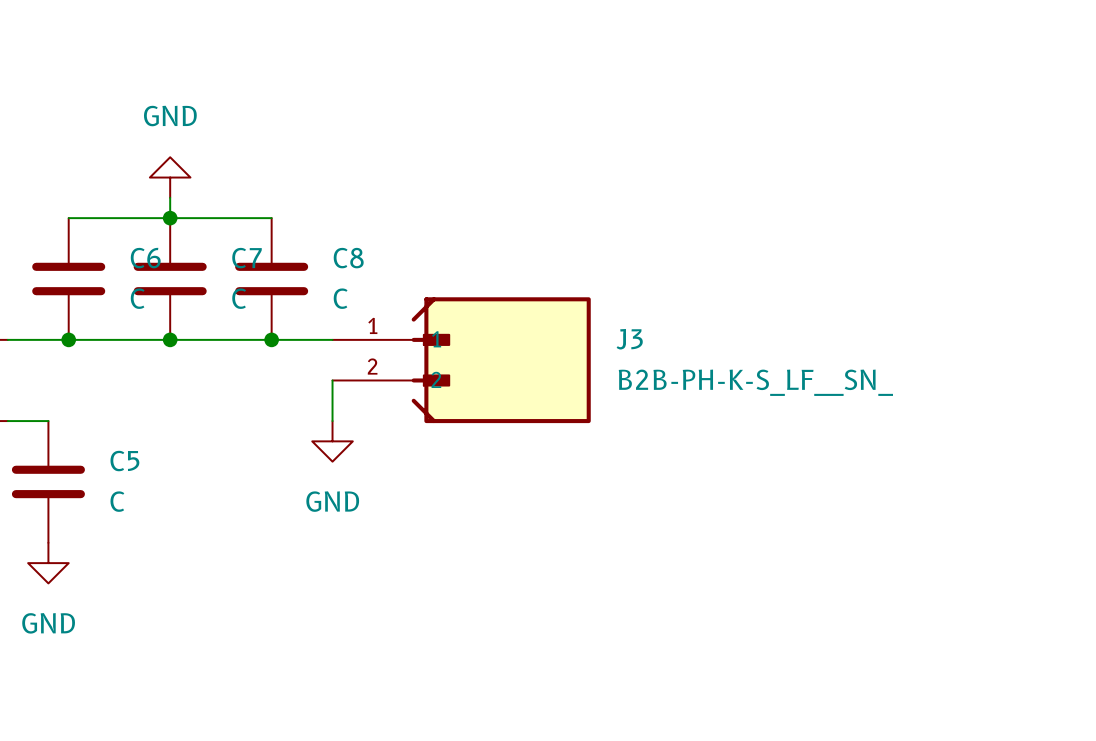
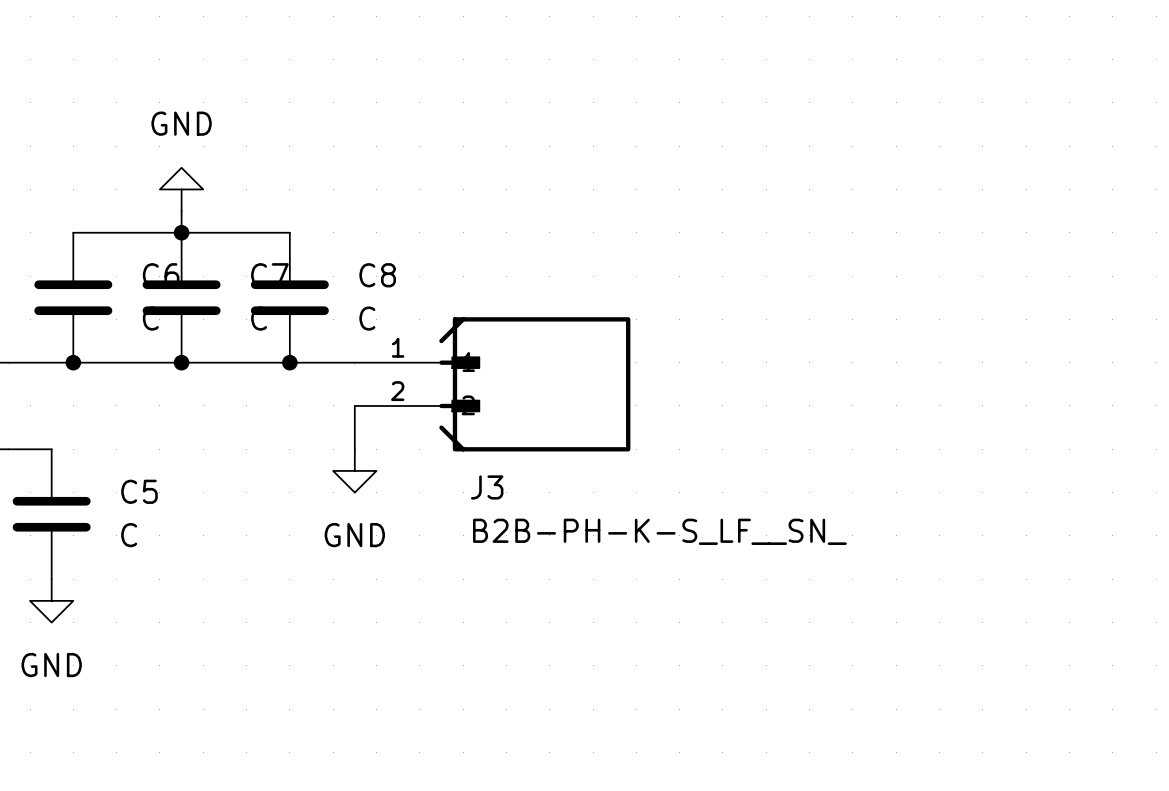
J3 name position: J3 (629, 339) -> J3 (487, 487)
J3 value position: B2B-PH-K-S_LF__SN_ (755, 382) -> B2B-PH-K-S_LF__SN_ (659, 531)

